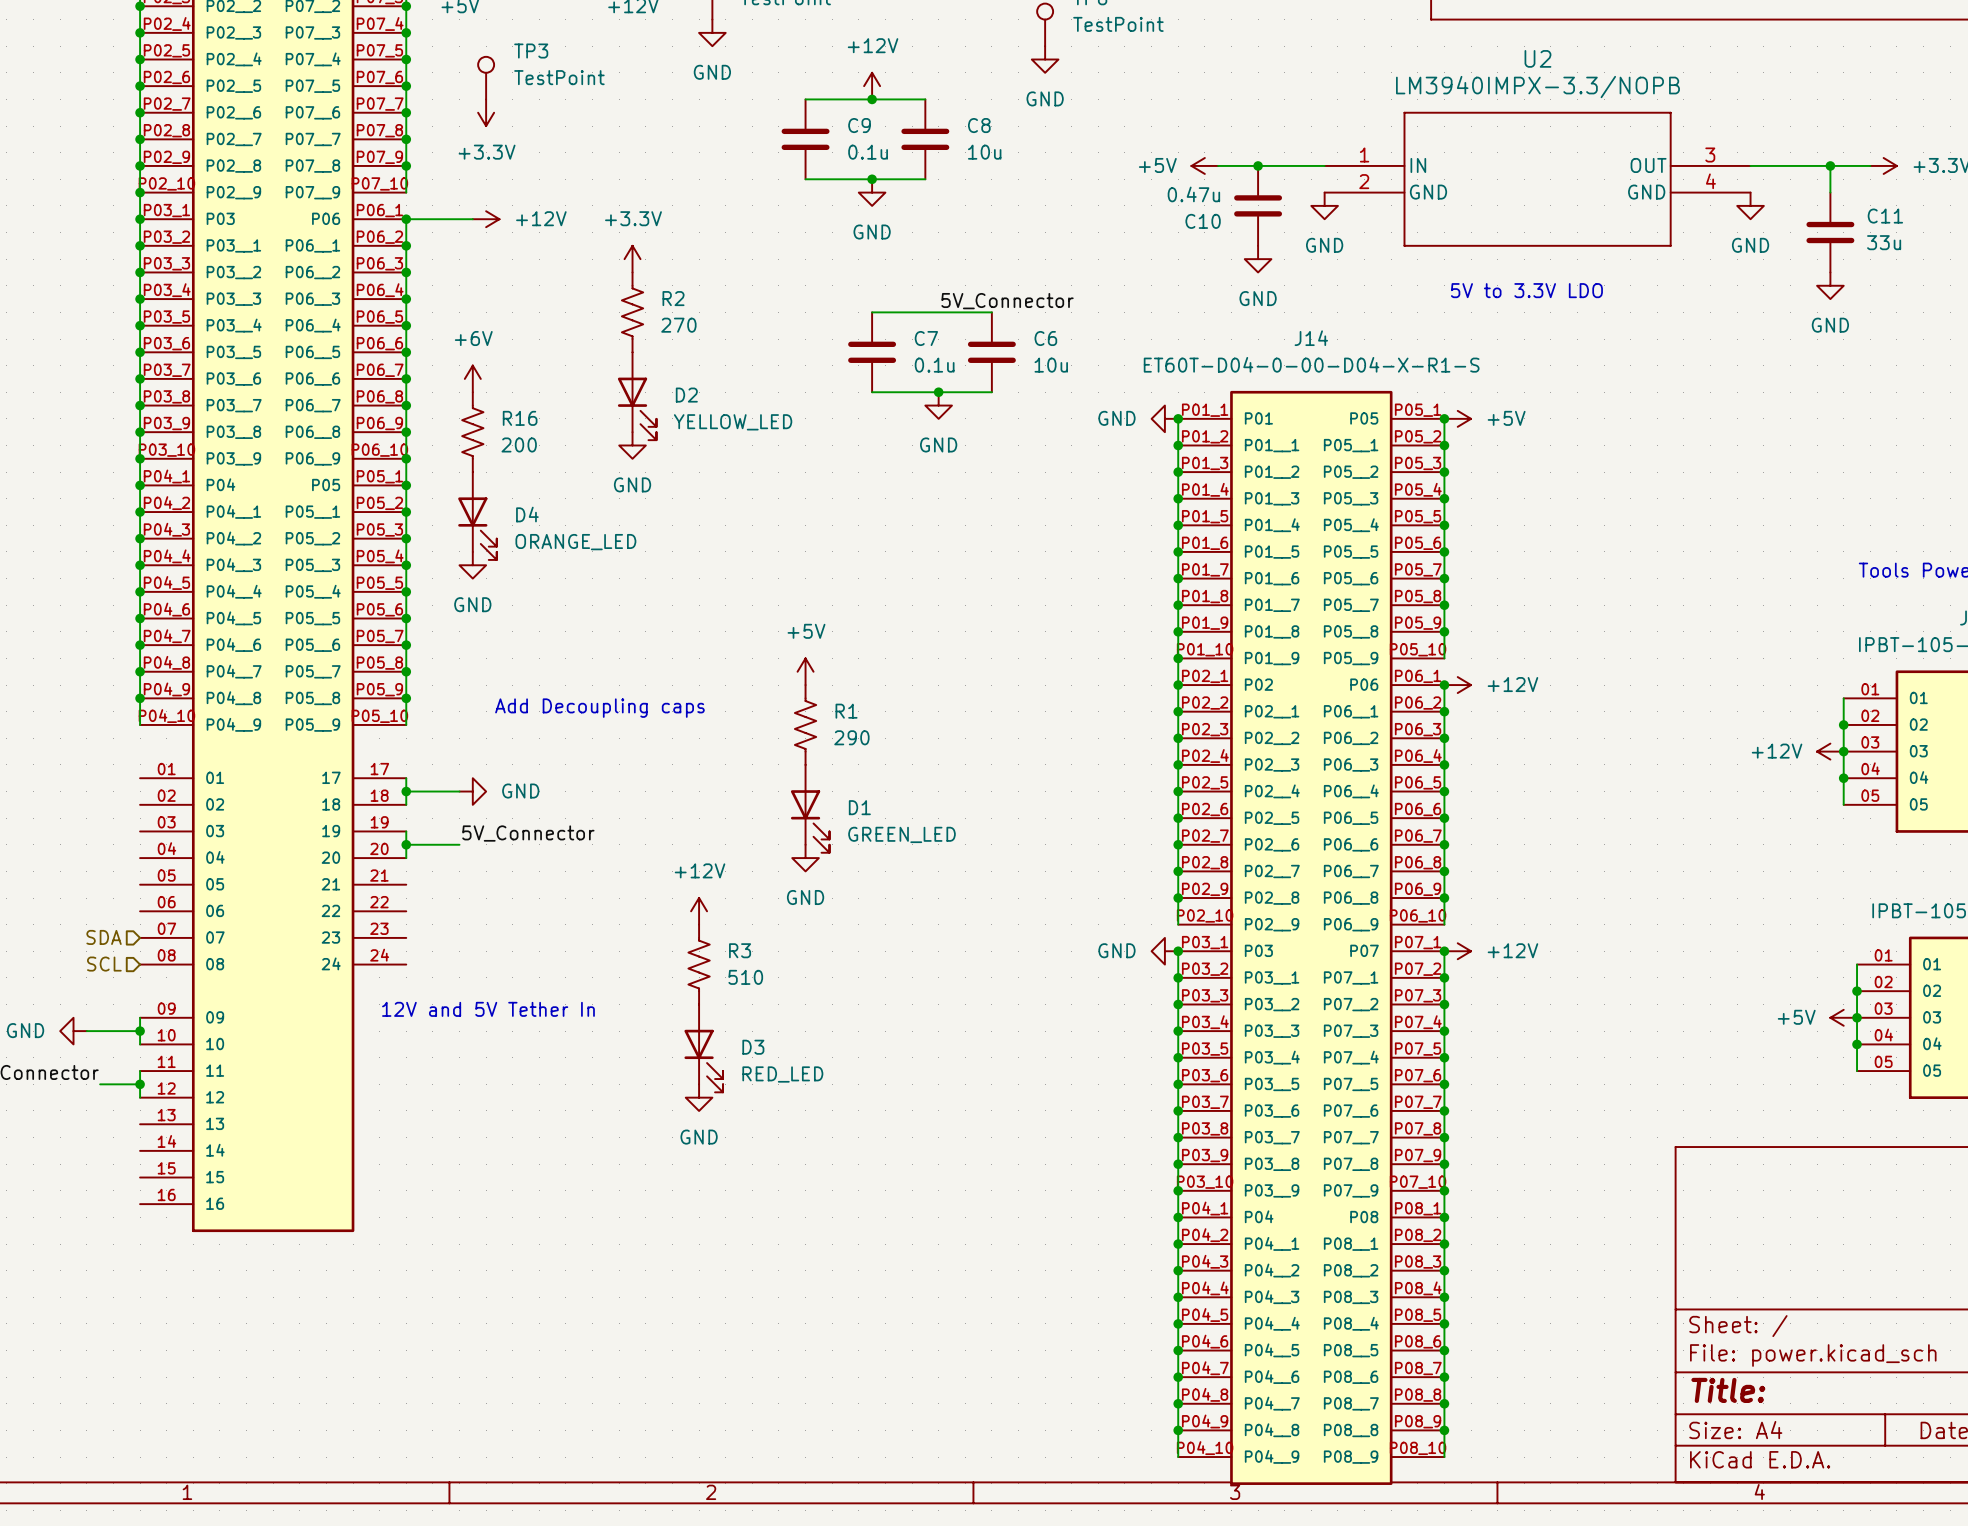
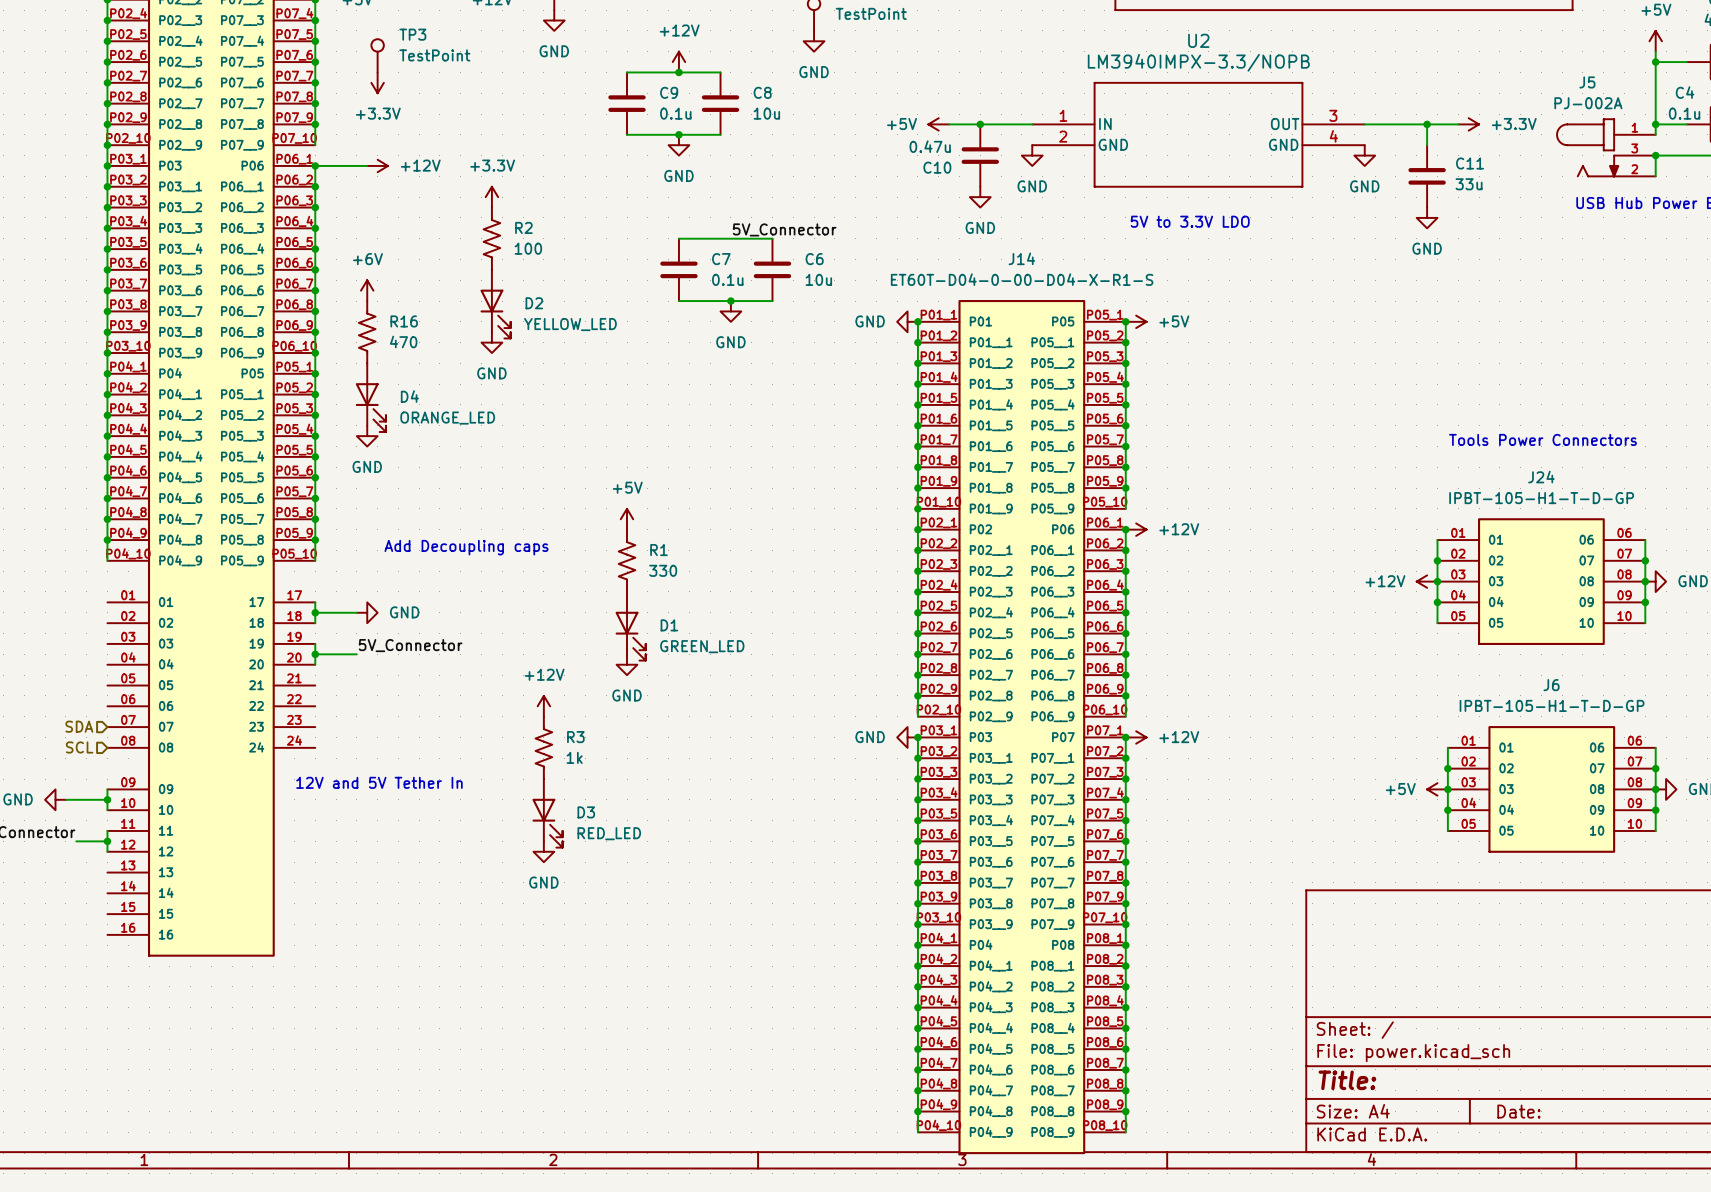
R2 value: 270 (678, 325) -> 100 (528, 248)
R16 value: 200 (519, 444) -> 470 (403, 341)
R1 value: 290 (851, 737) -> 330 (663, 570)
R3 value: 510 (745, 977) -> 1k (574, 757)

